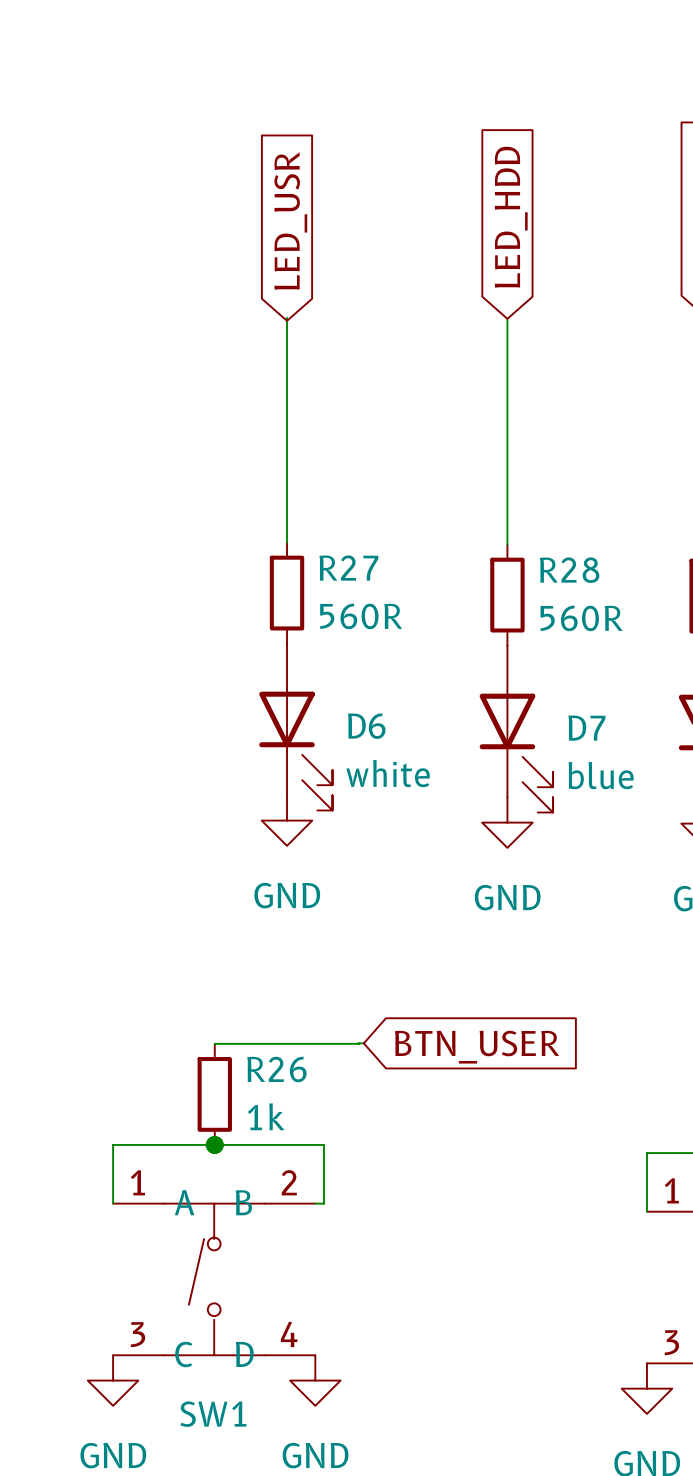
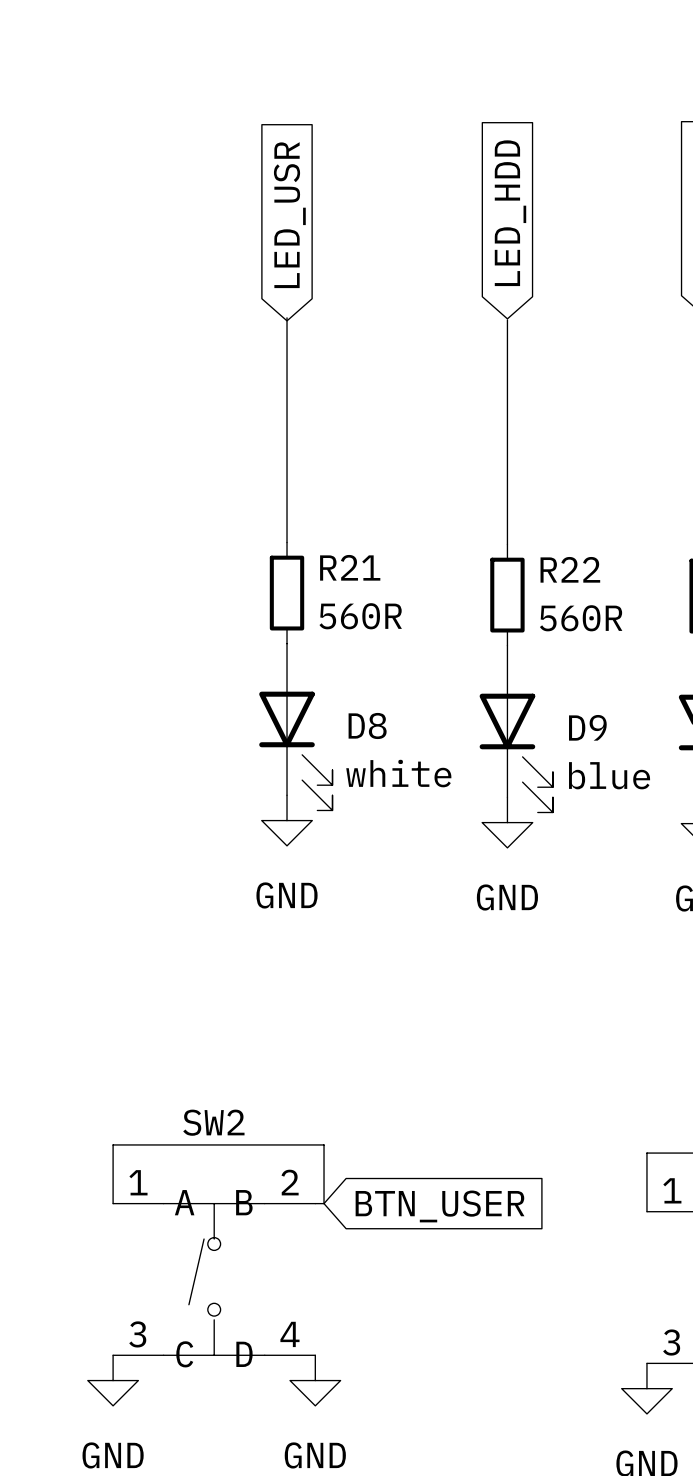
R27 name: R27 (348, 568) -> R21 (350, 567)
R28 name: R28 (569, 570) -> R22 (570, 569)
D6 name: D6 (366, 726) -> D8 (367, 725)
D7 name: D7 (586, 728) -> D9 (587, 727)
wire: (363, 1043) (214, 1043) -> none
global label position: BTN_USER (477, 1047) -> BTN_USER (440, 1206)
R26: 1k (214, 1094) -> none
junction: (214, 1144) -> none
SW1 name: SW1 (213, 1414) -> SW2 (213, 1122)

